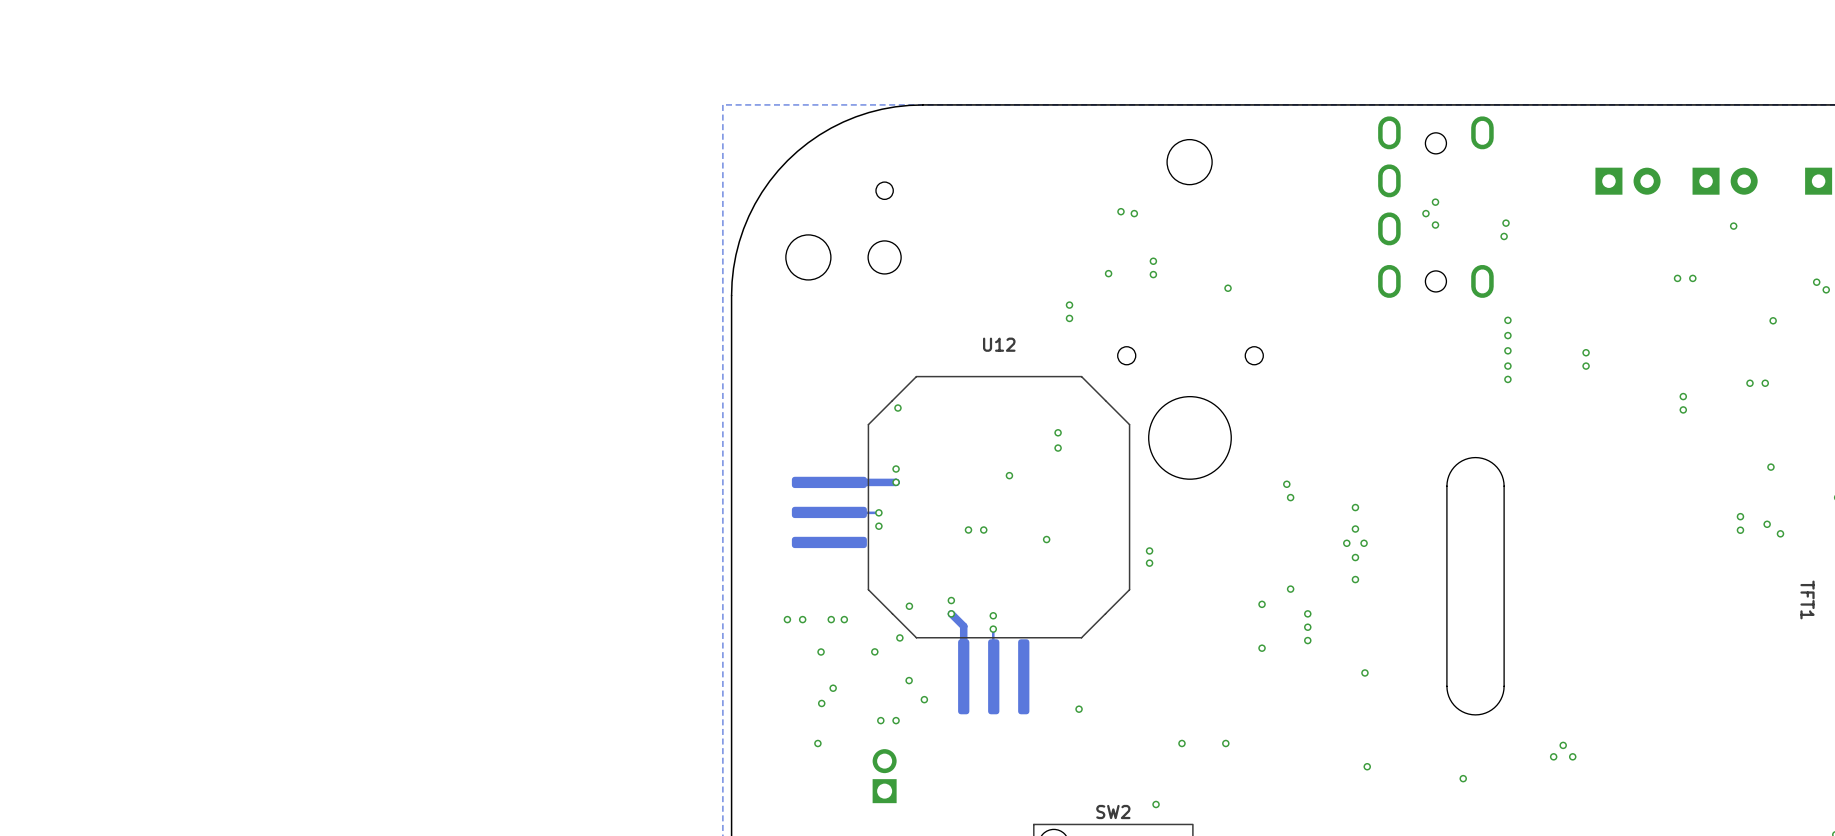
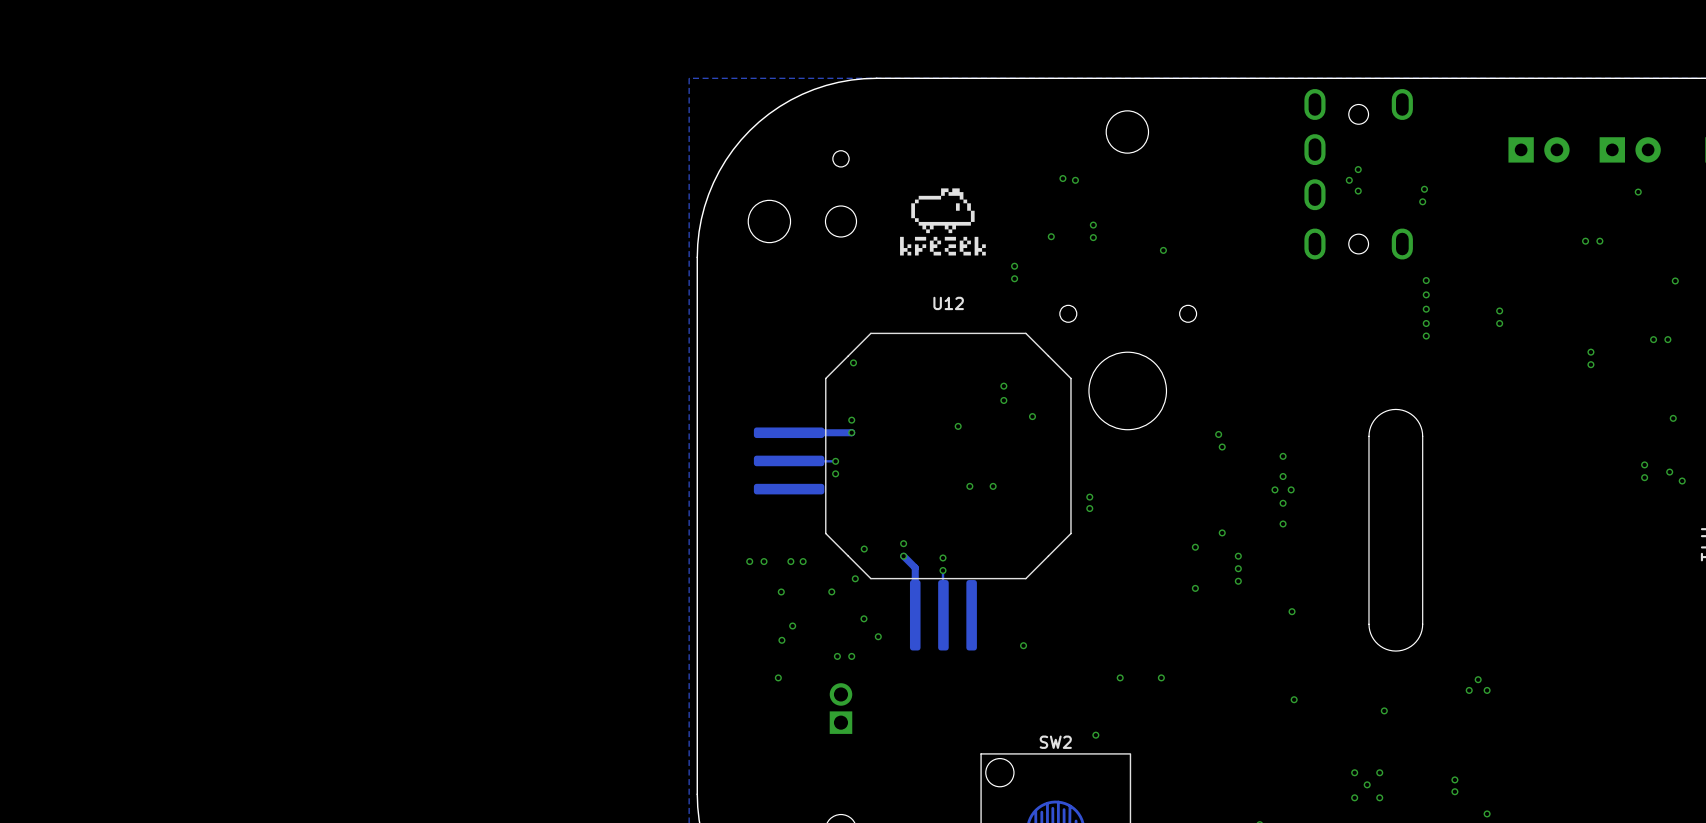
drawing: none -> [900, 188, 986, 256]
via: none -> (1032, 416)
via: (968, 530) -> none
via: (983, 530) -> none
via: none -> (969, 486)

